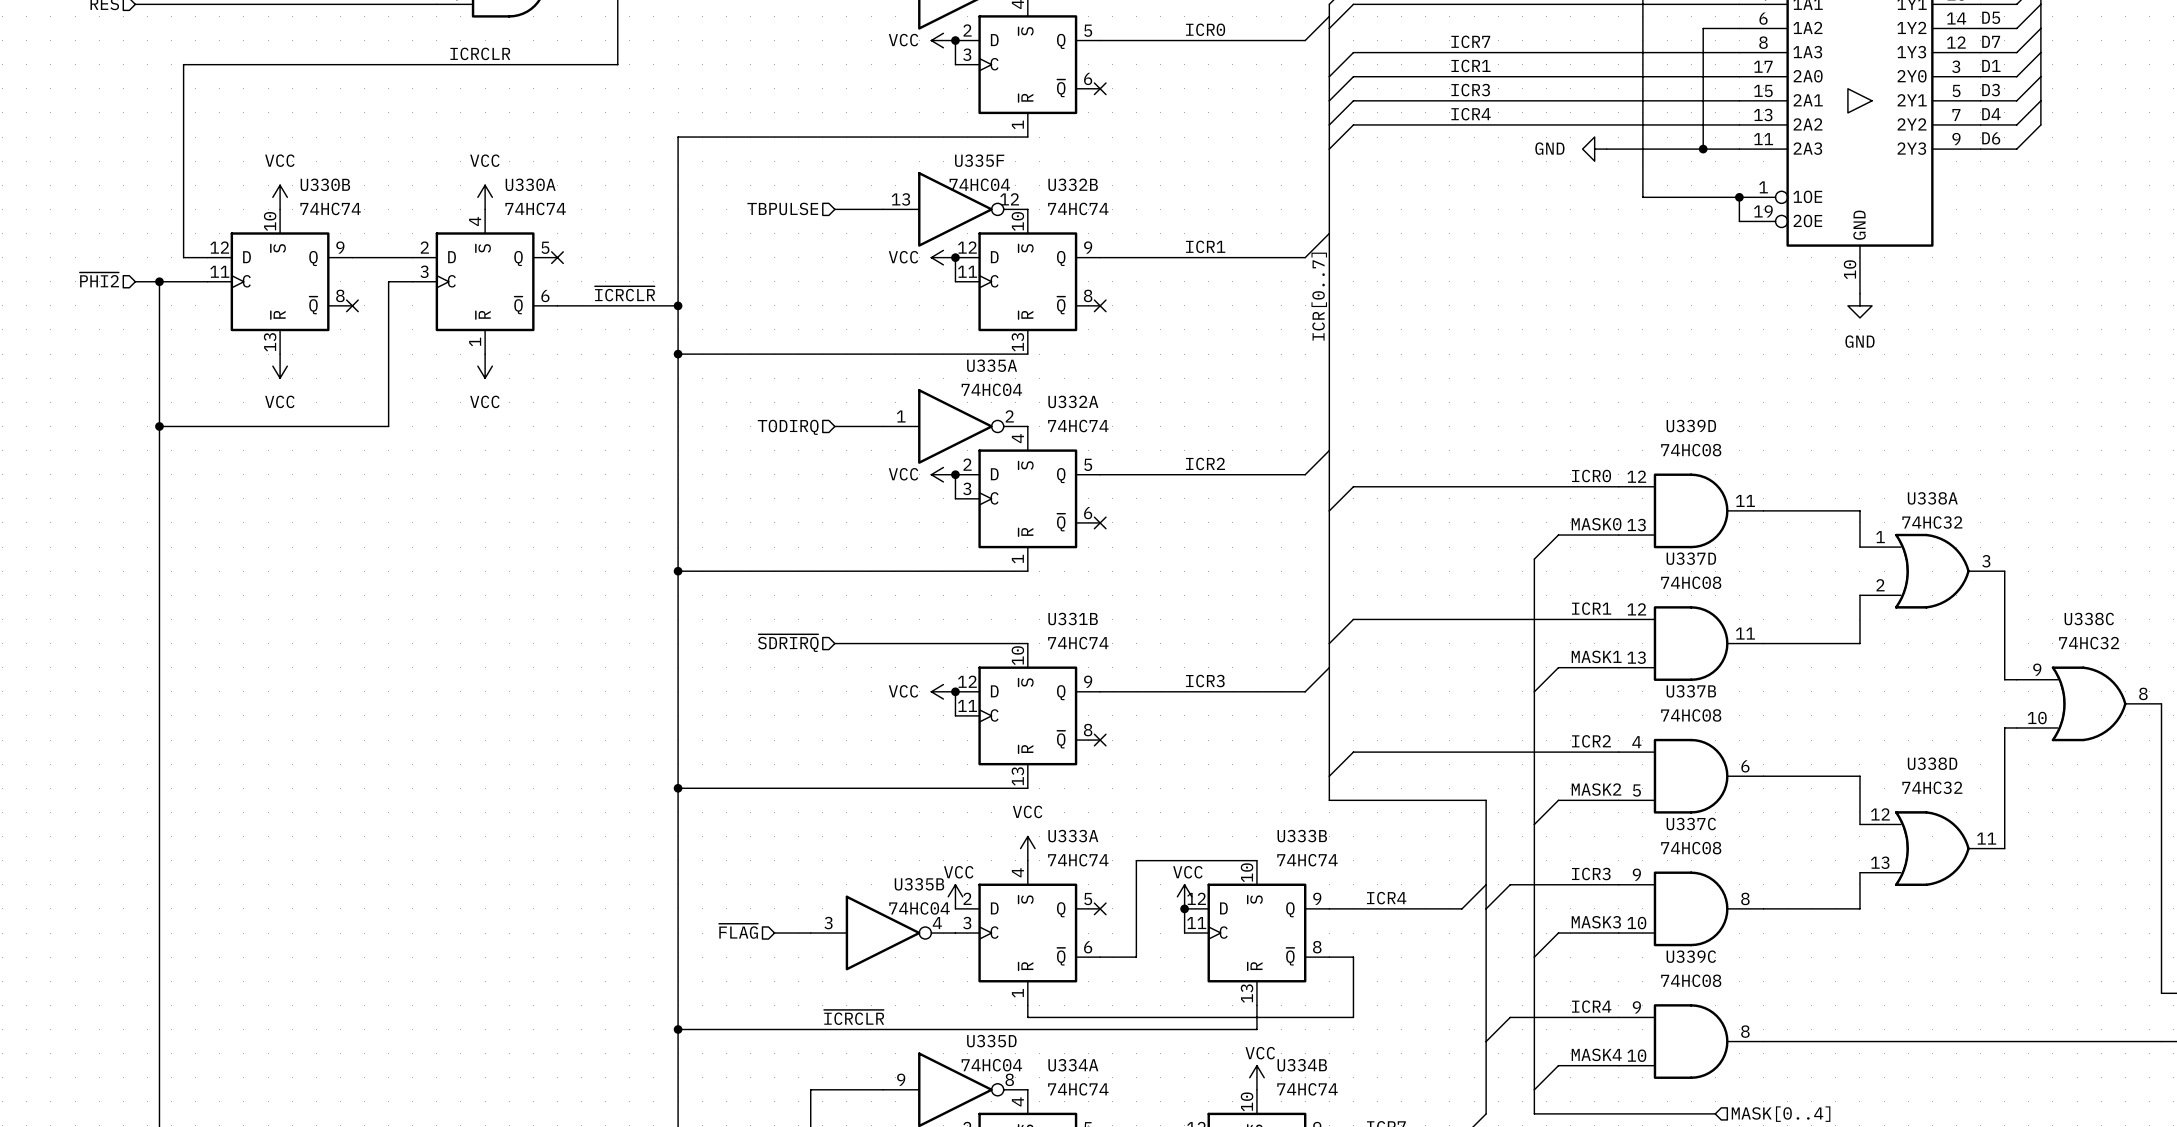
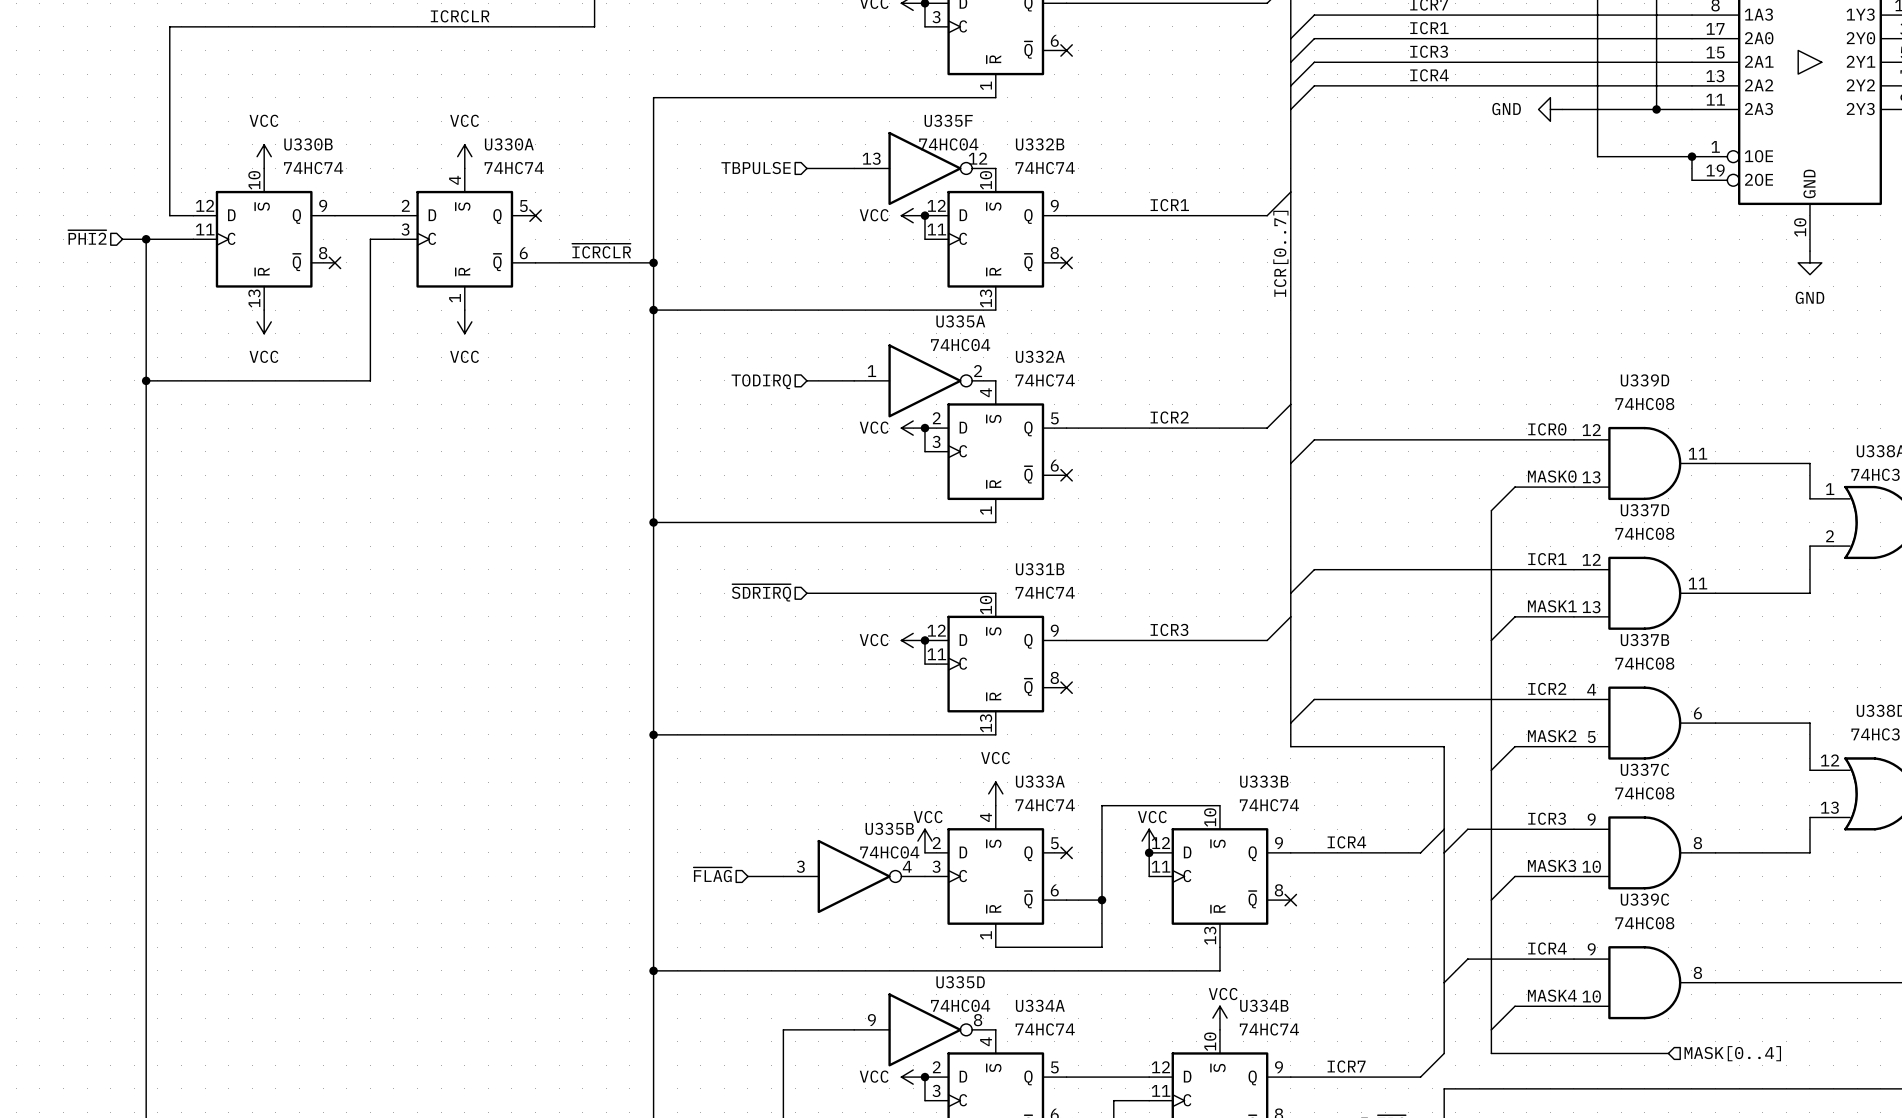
junction: none -> (1101, 900)
wire: (1329, 957) (1353, 957) (1353, 1017) (1027, 1017) (1027, 1005) -> (1101, 900) (1101, 947) (995, 947)
no-connect mark: none -> (1290, 900)
label: ~{ICRCLR} (854, 1017) -> none

